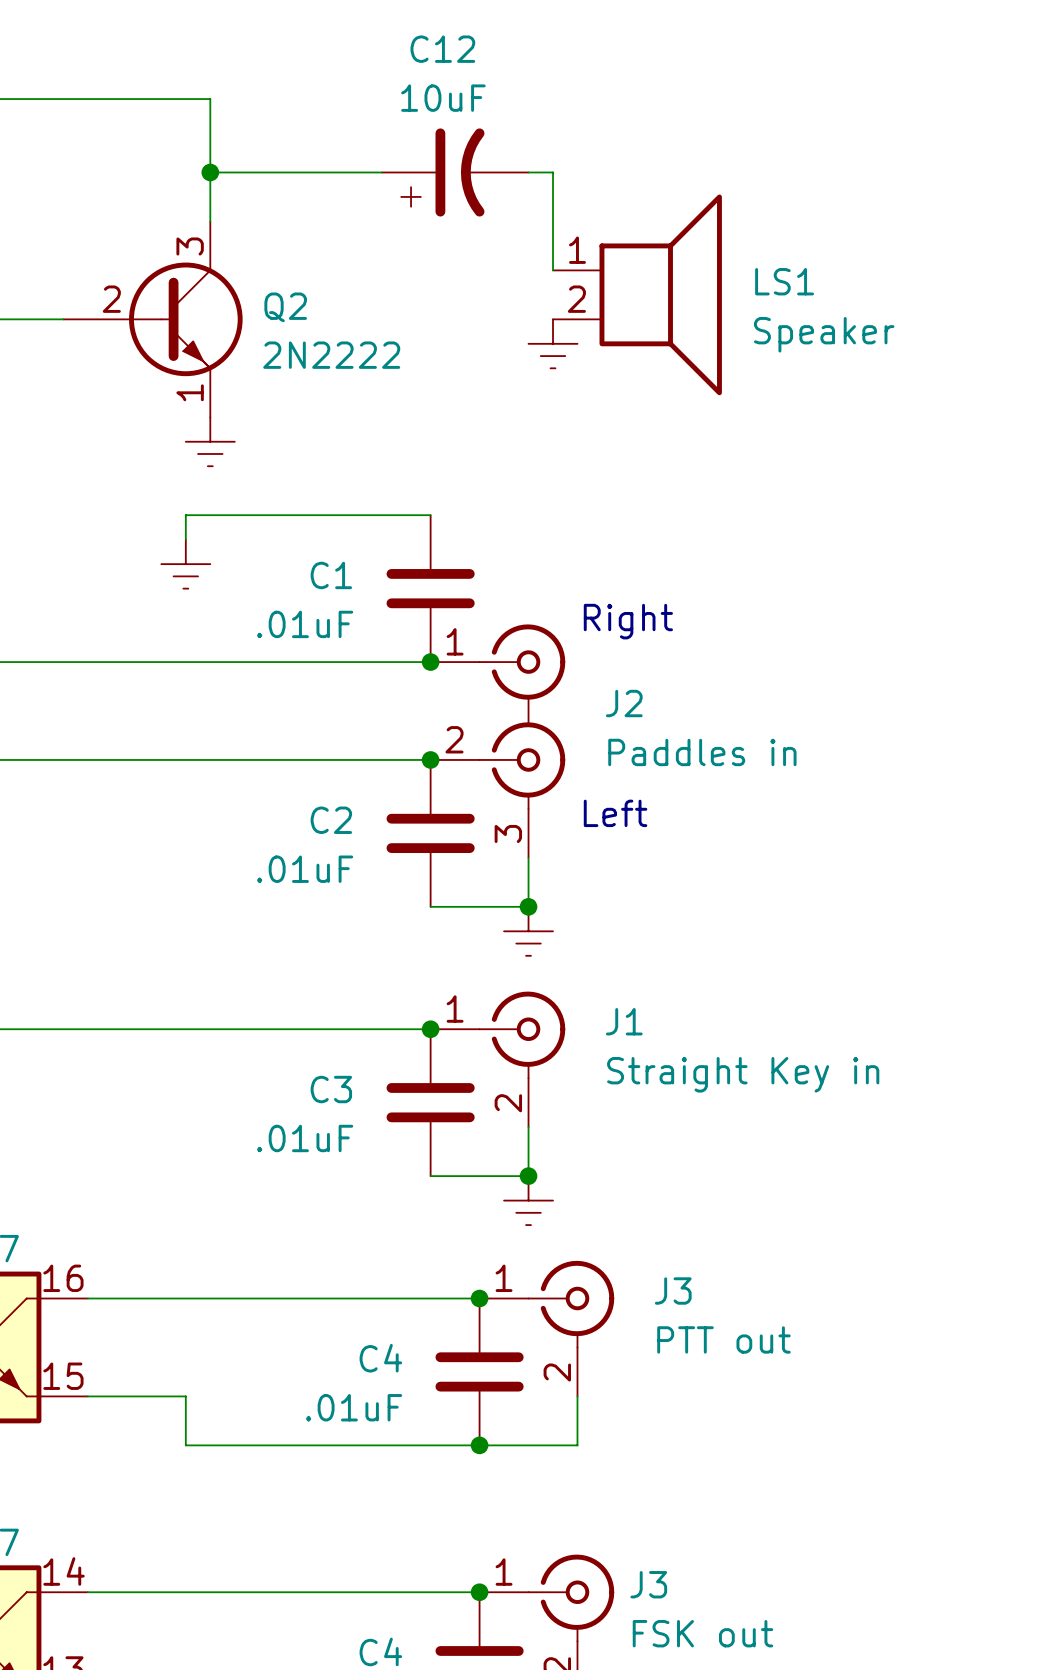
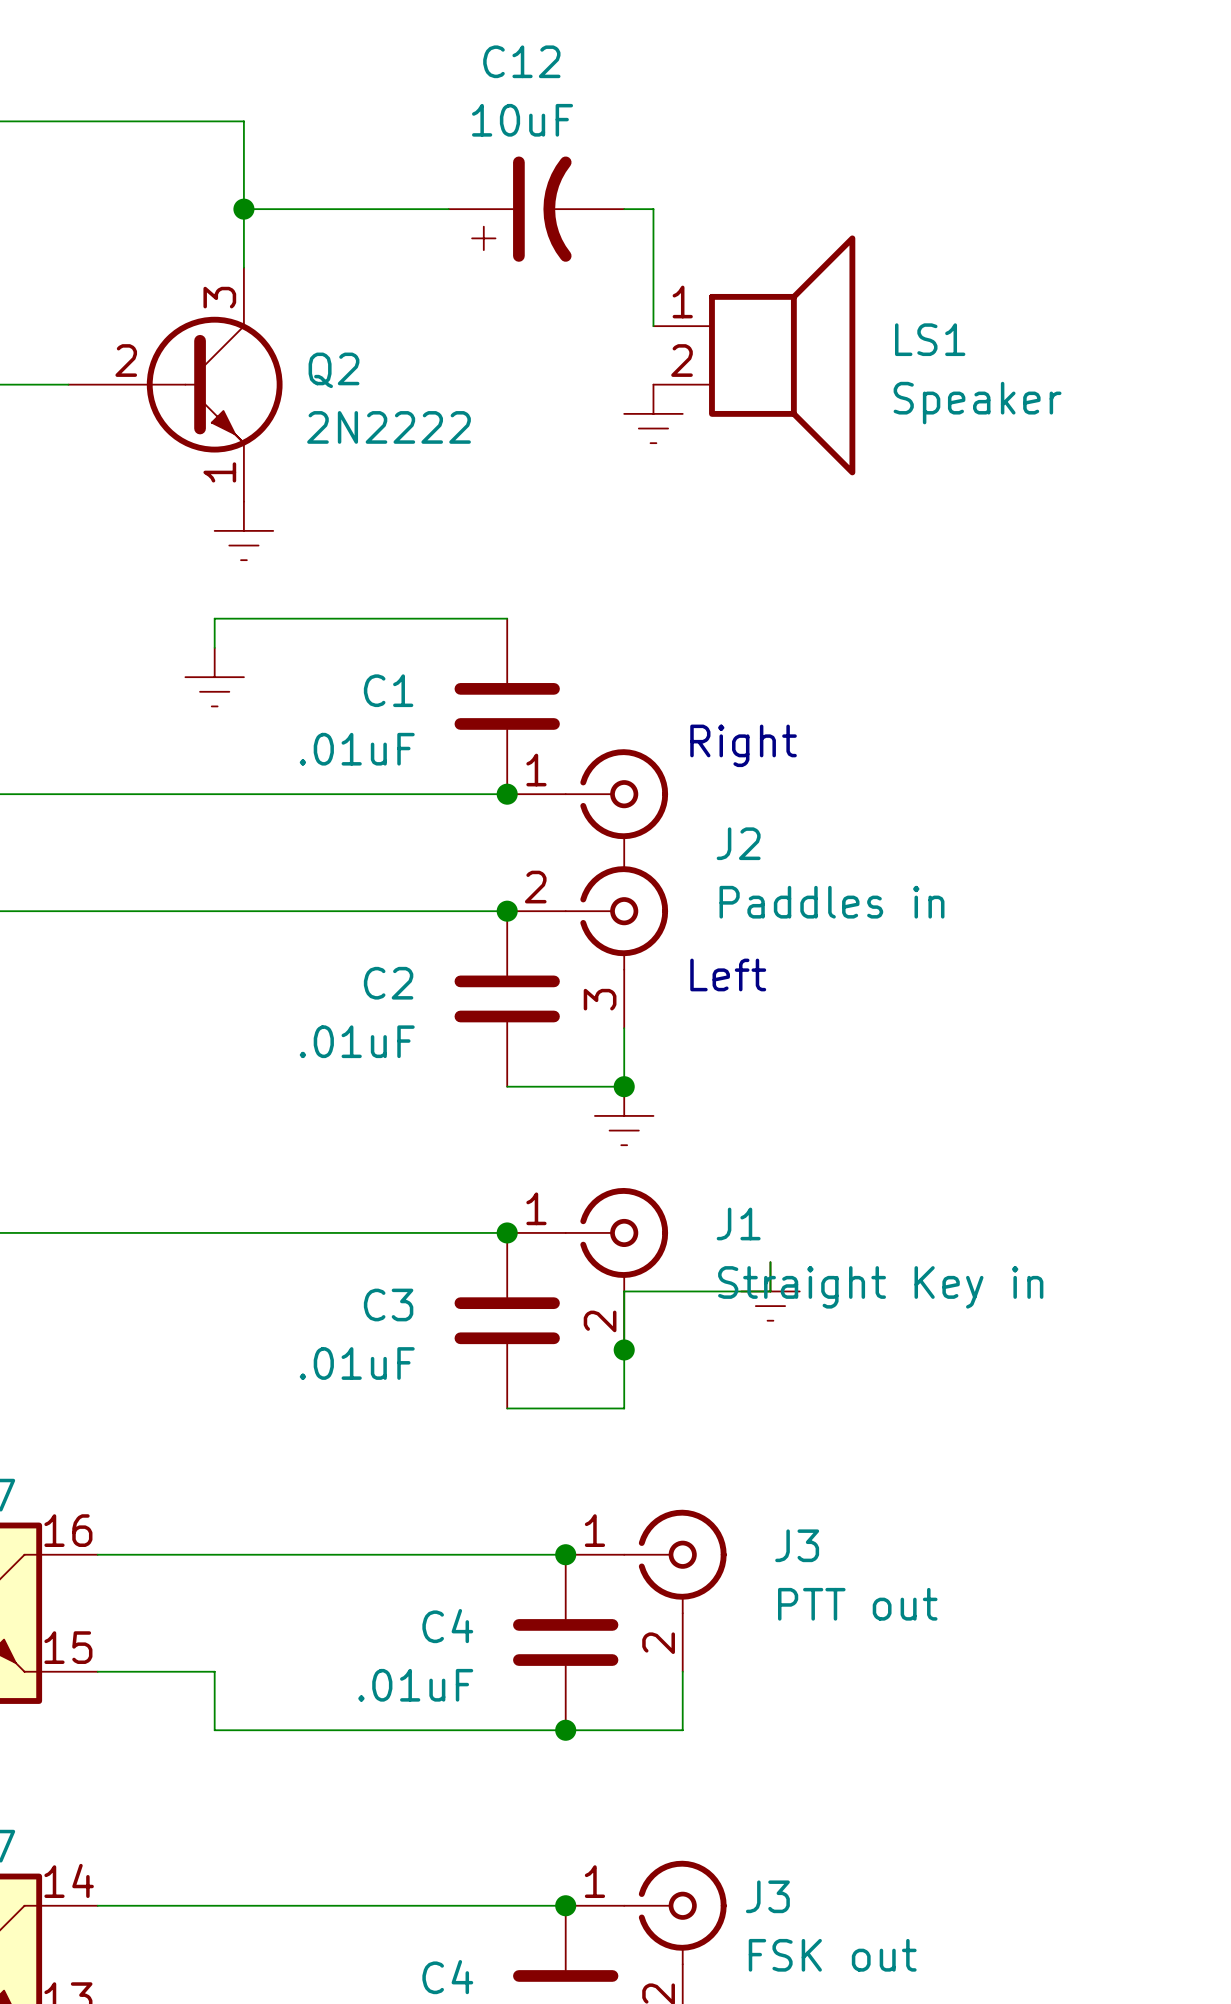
wire: none -> (770, 1262) (770, 1291) (624, 1291) (624, 1349)
junction position: (528, 1176) -> (624, 1349)
power symbol position: (528, 1200) -> (770, 1291)

